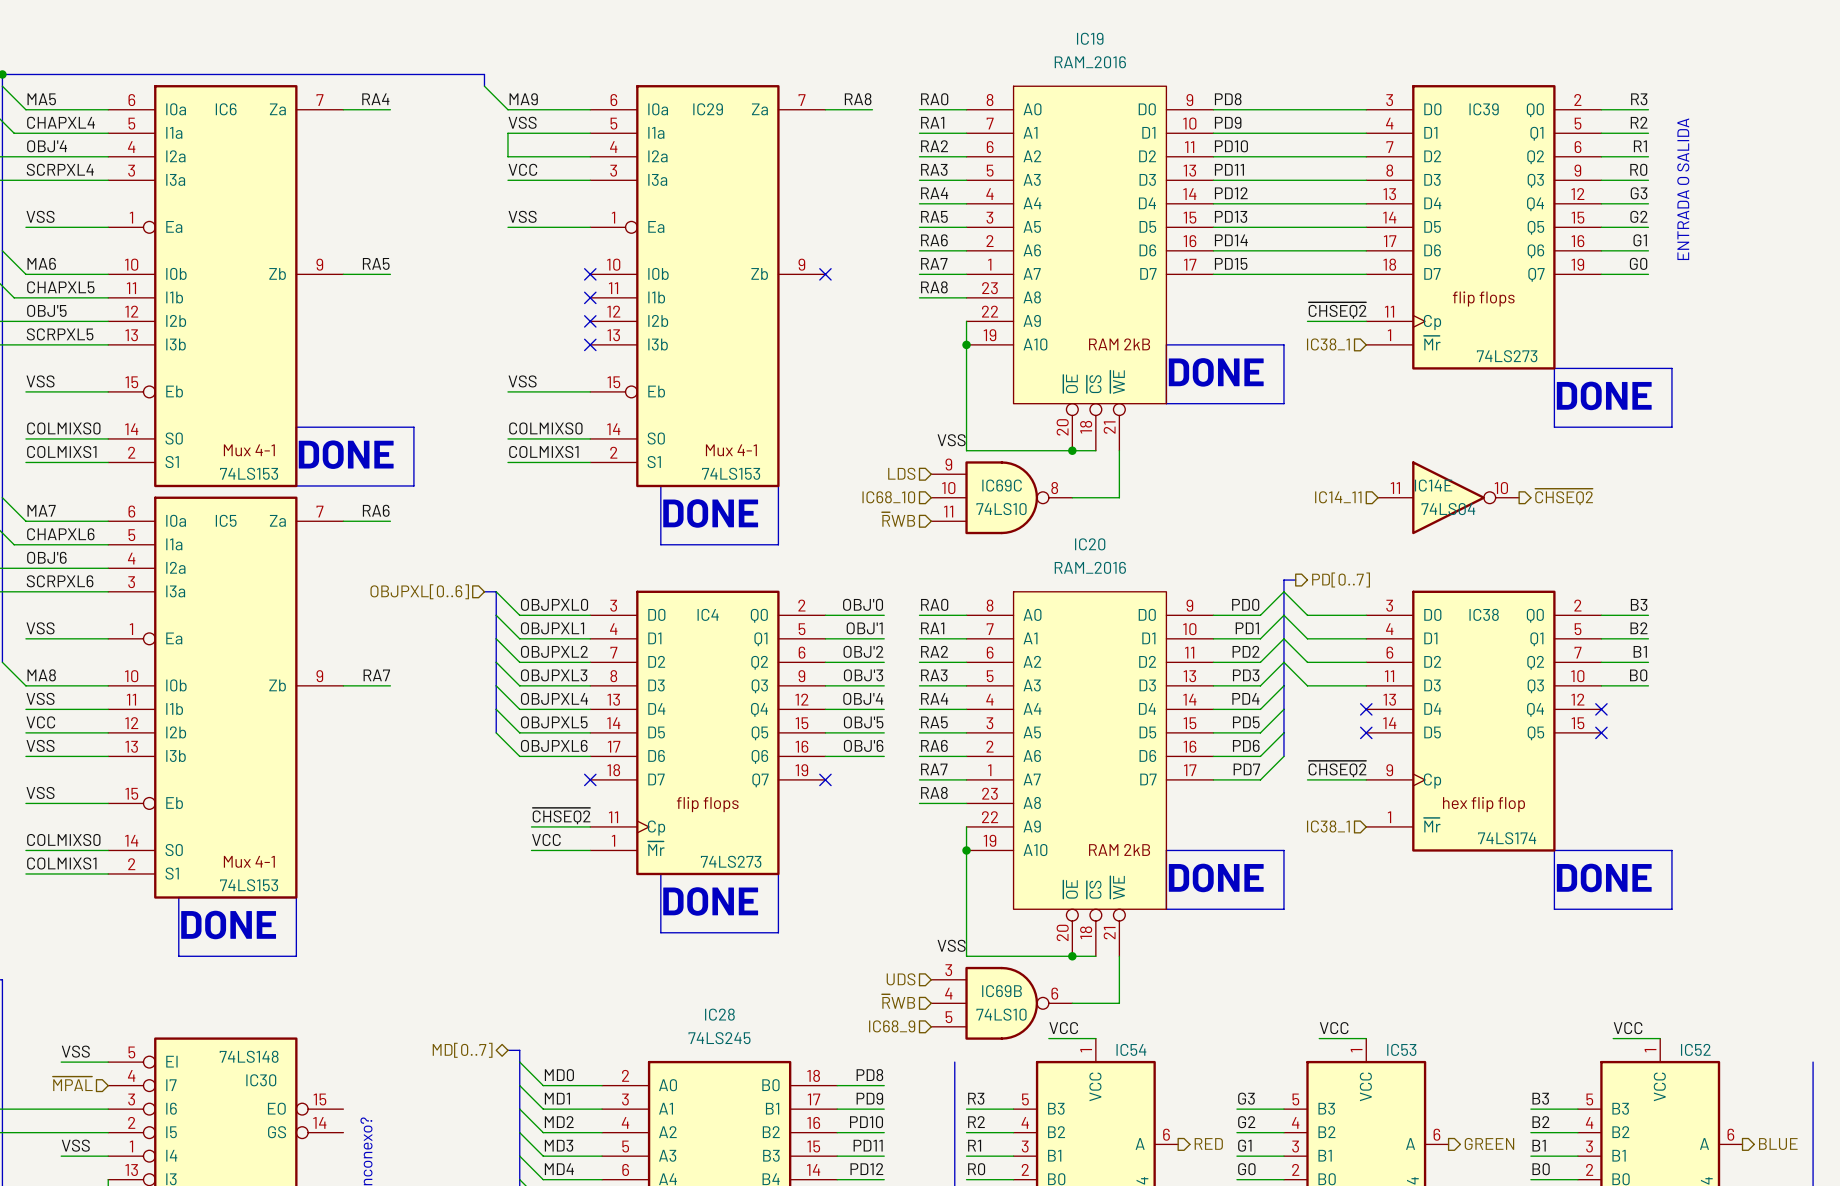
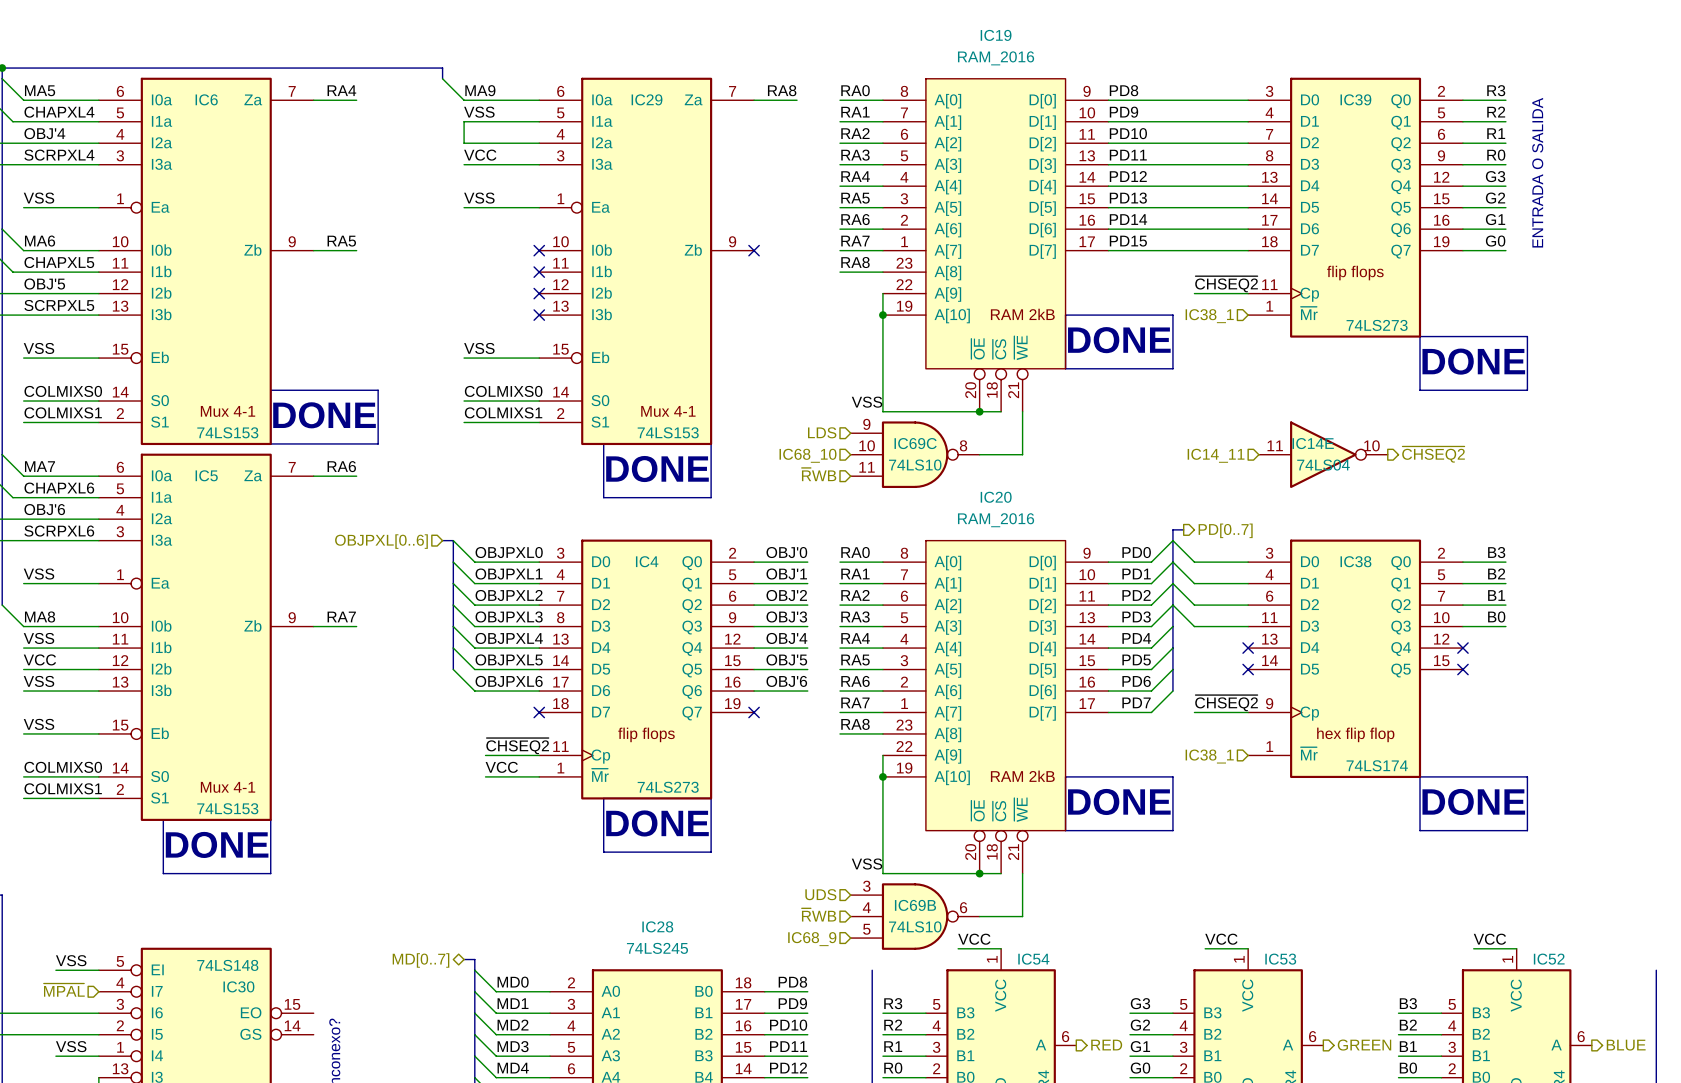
IC19 symbol: [966, 86, 1214, 451] -> [882, 78, 1109, 412]
IC20 symbol: [966, 591, 1214, 957] -> [882, 540, 1109, 874]

